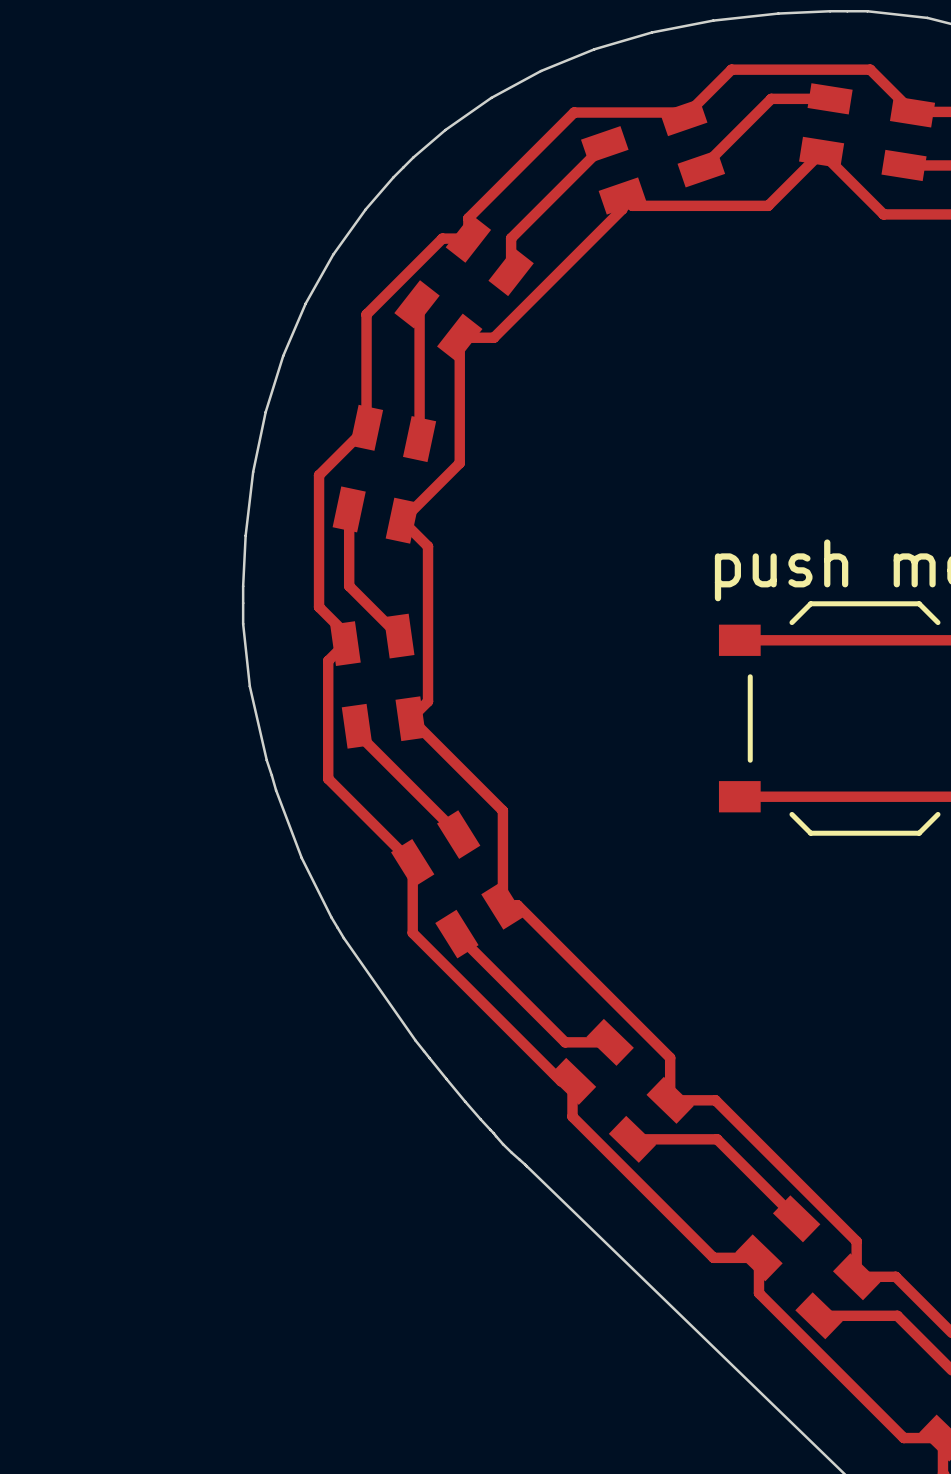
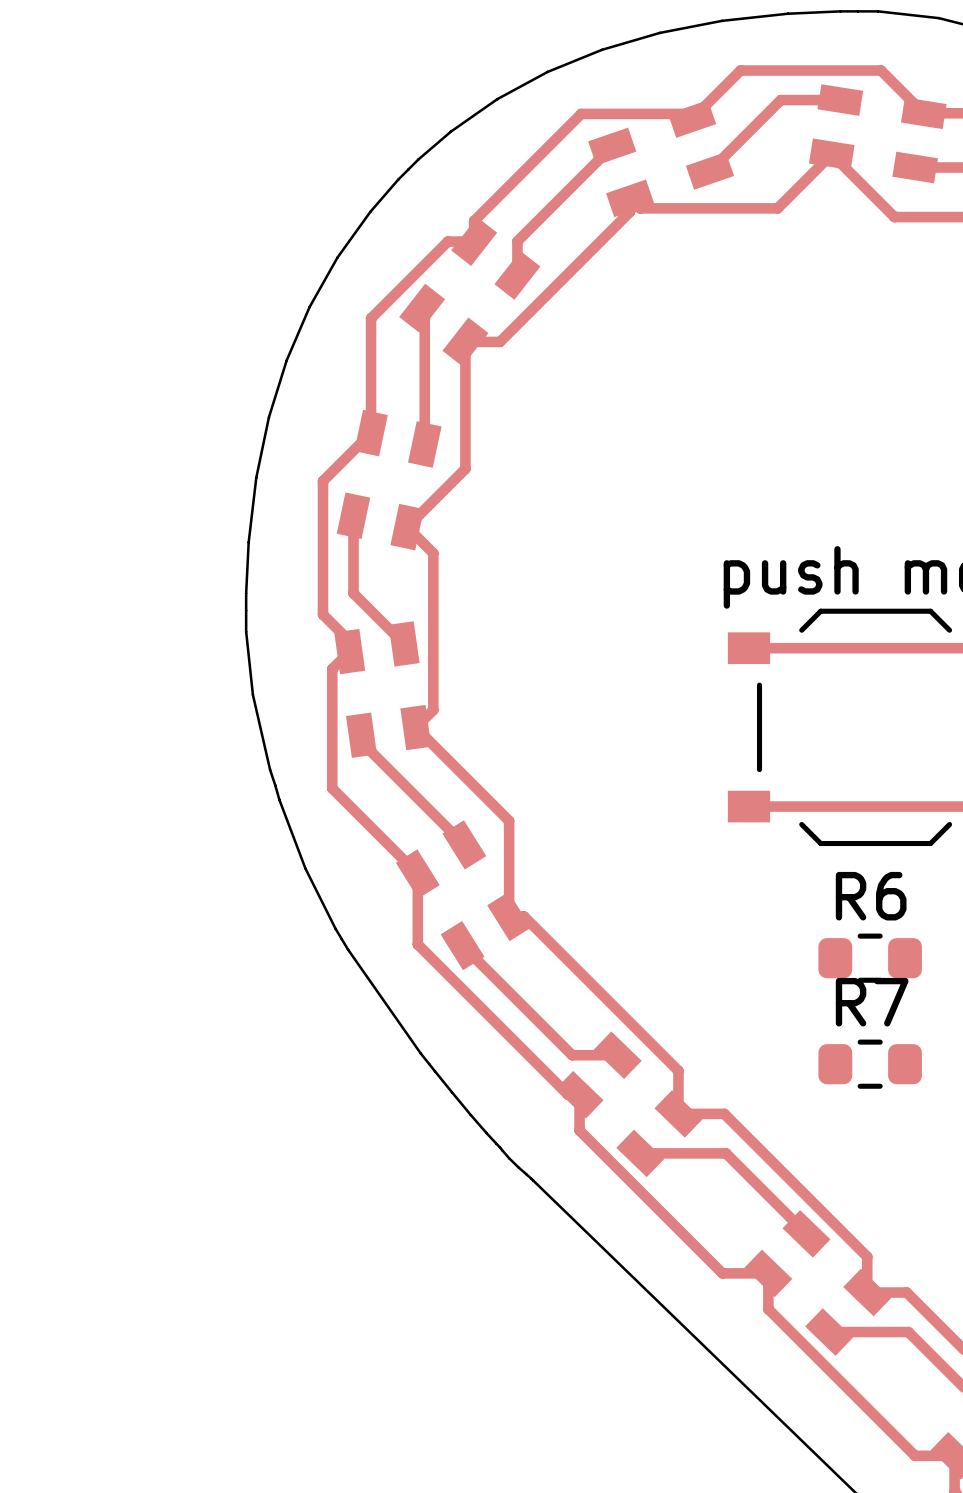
R6: none -> (870, 958)
R7: none -> (870, 1064)

